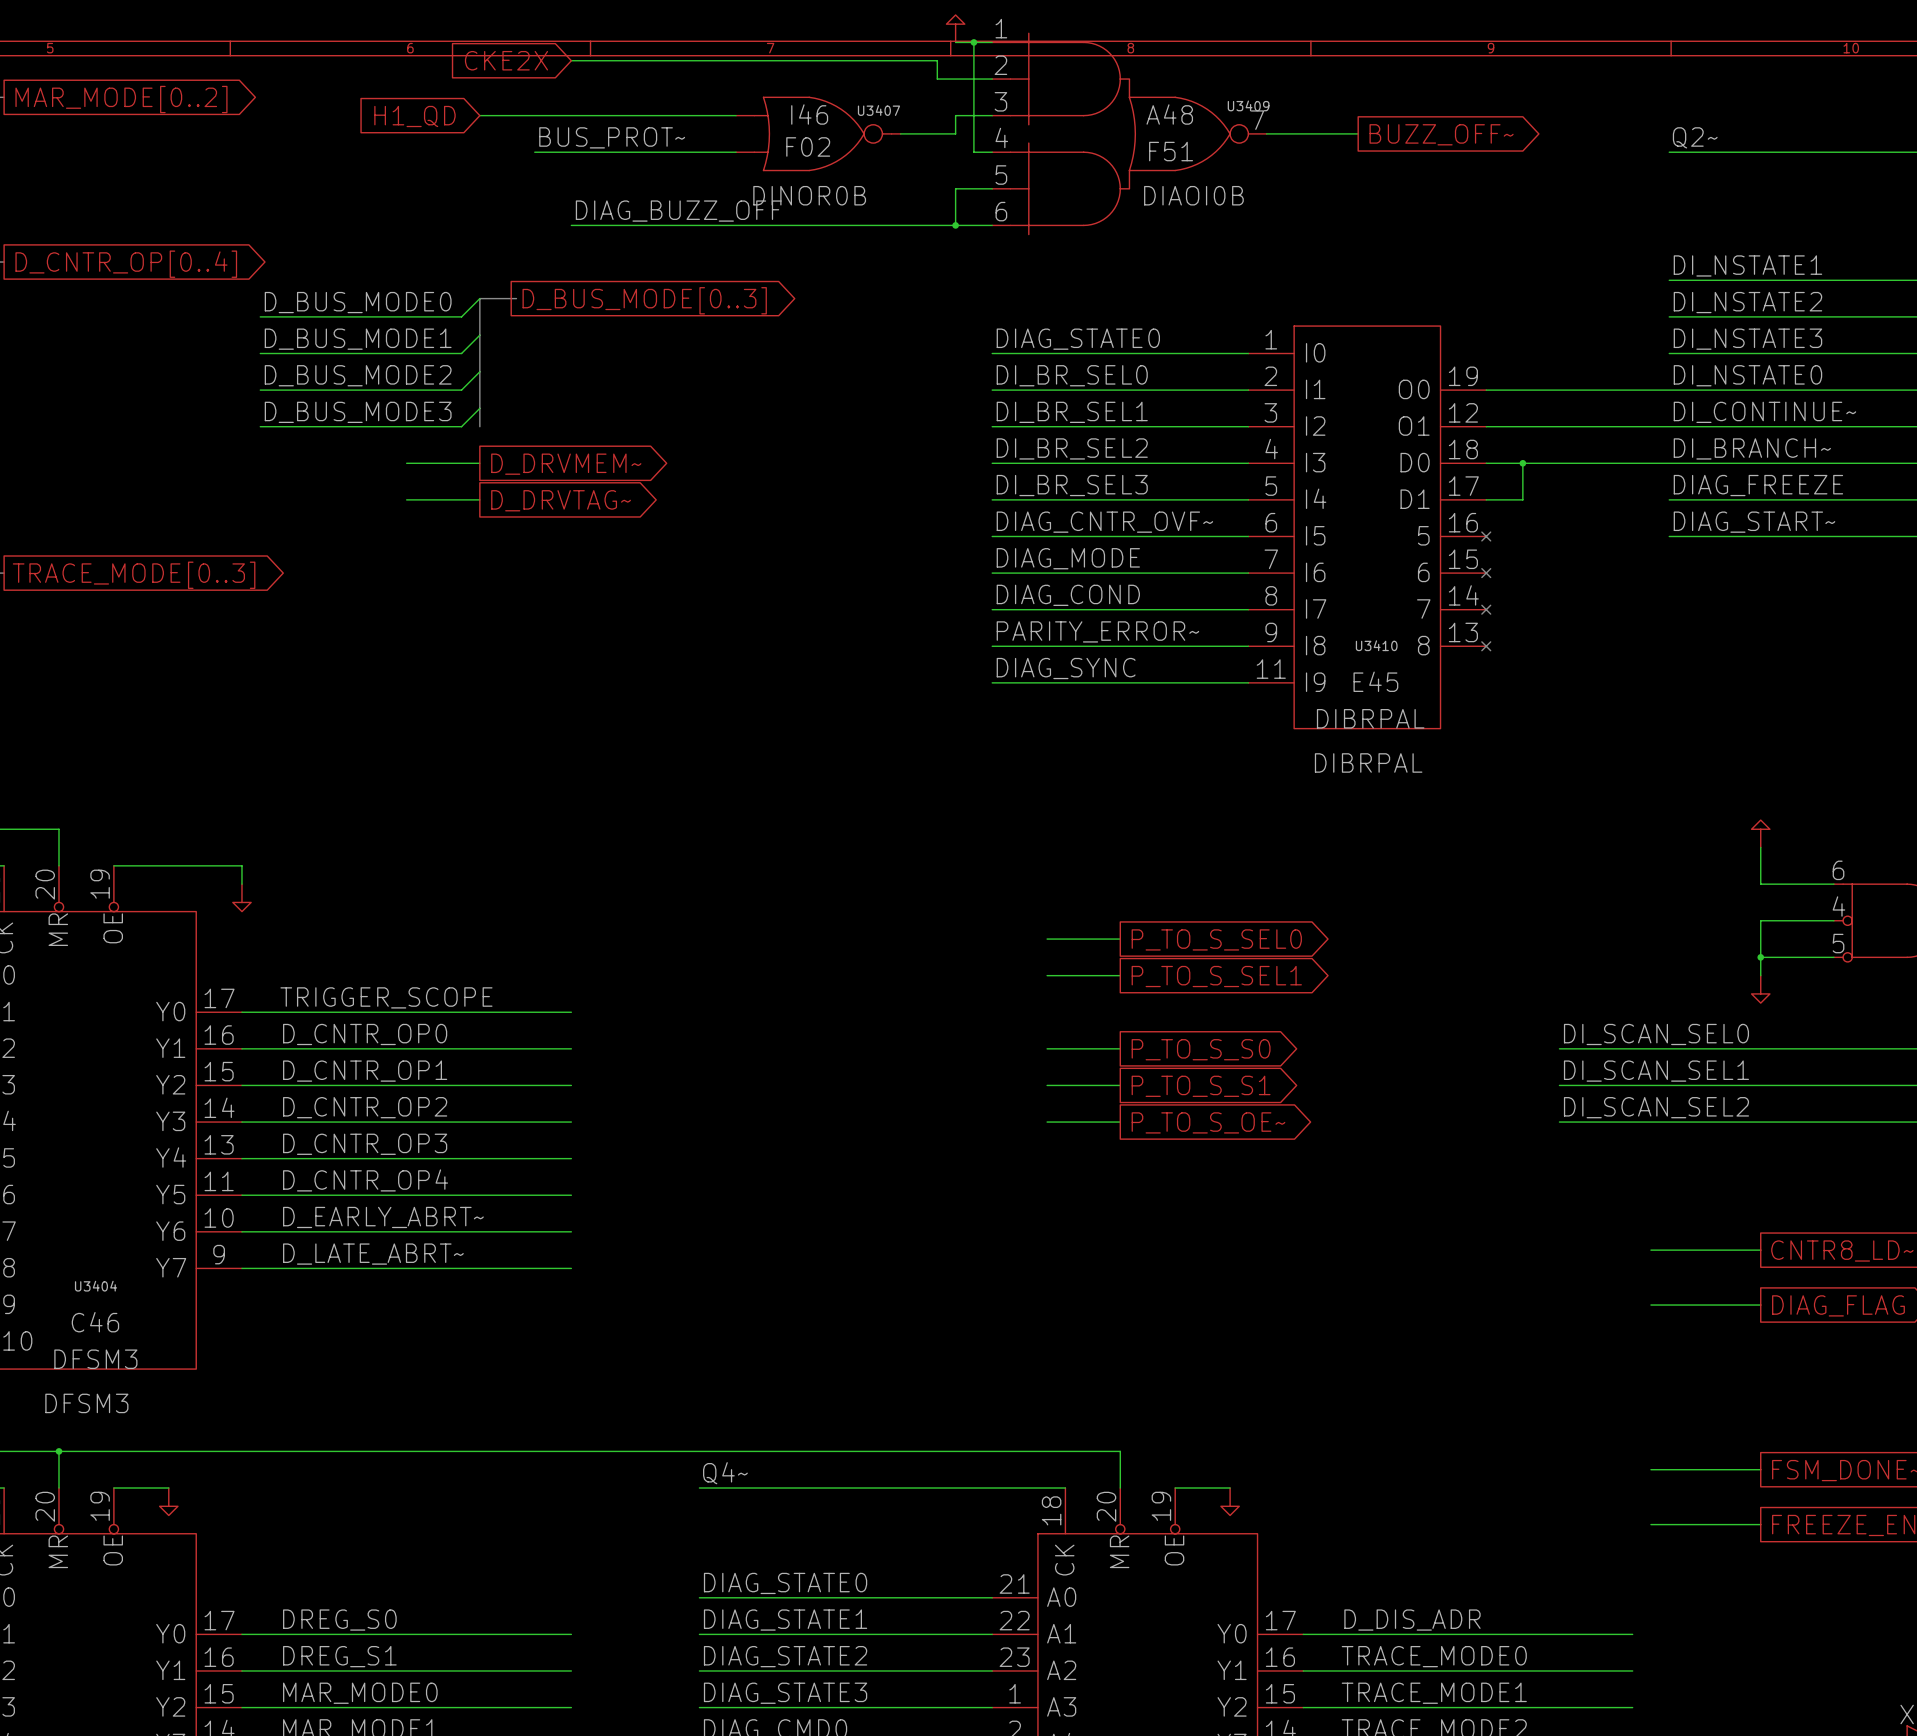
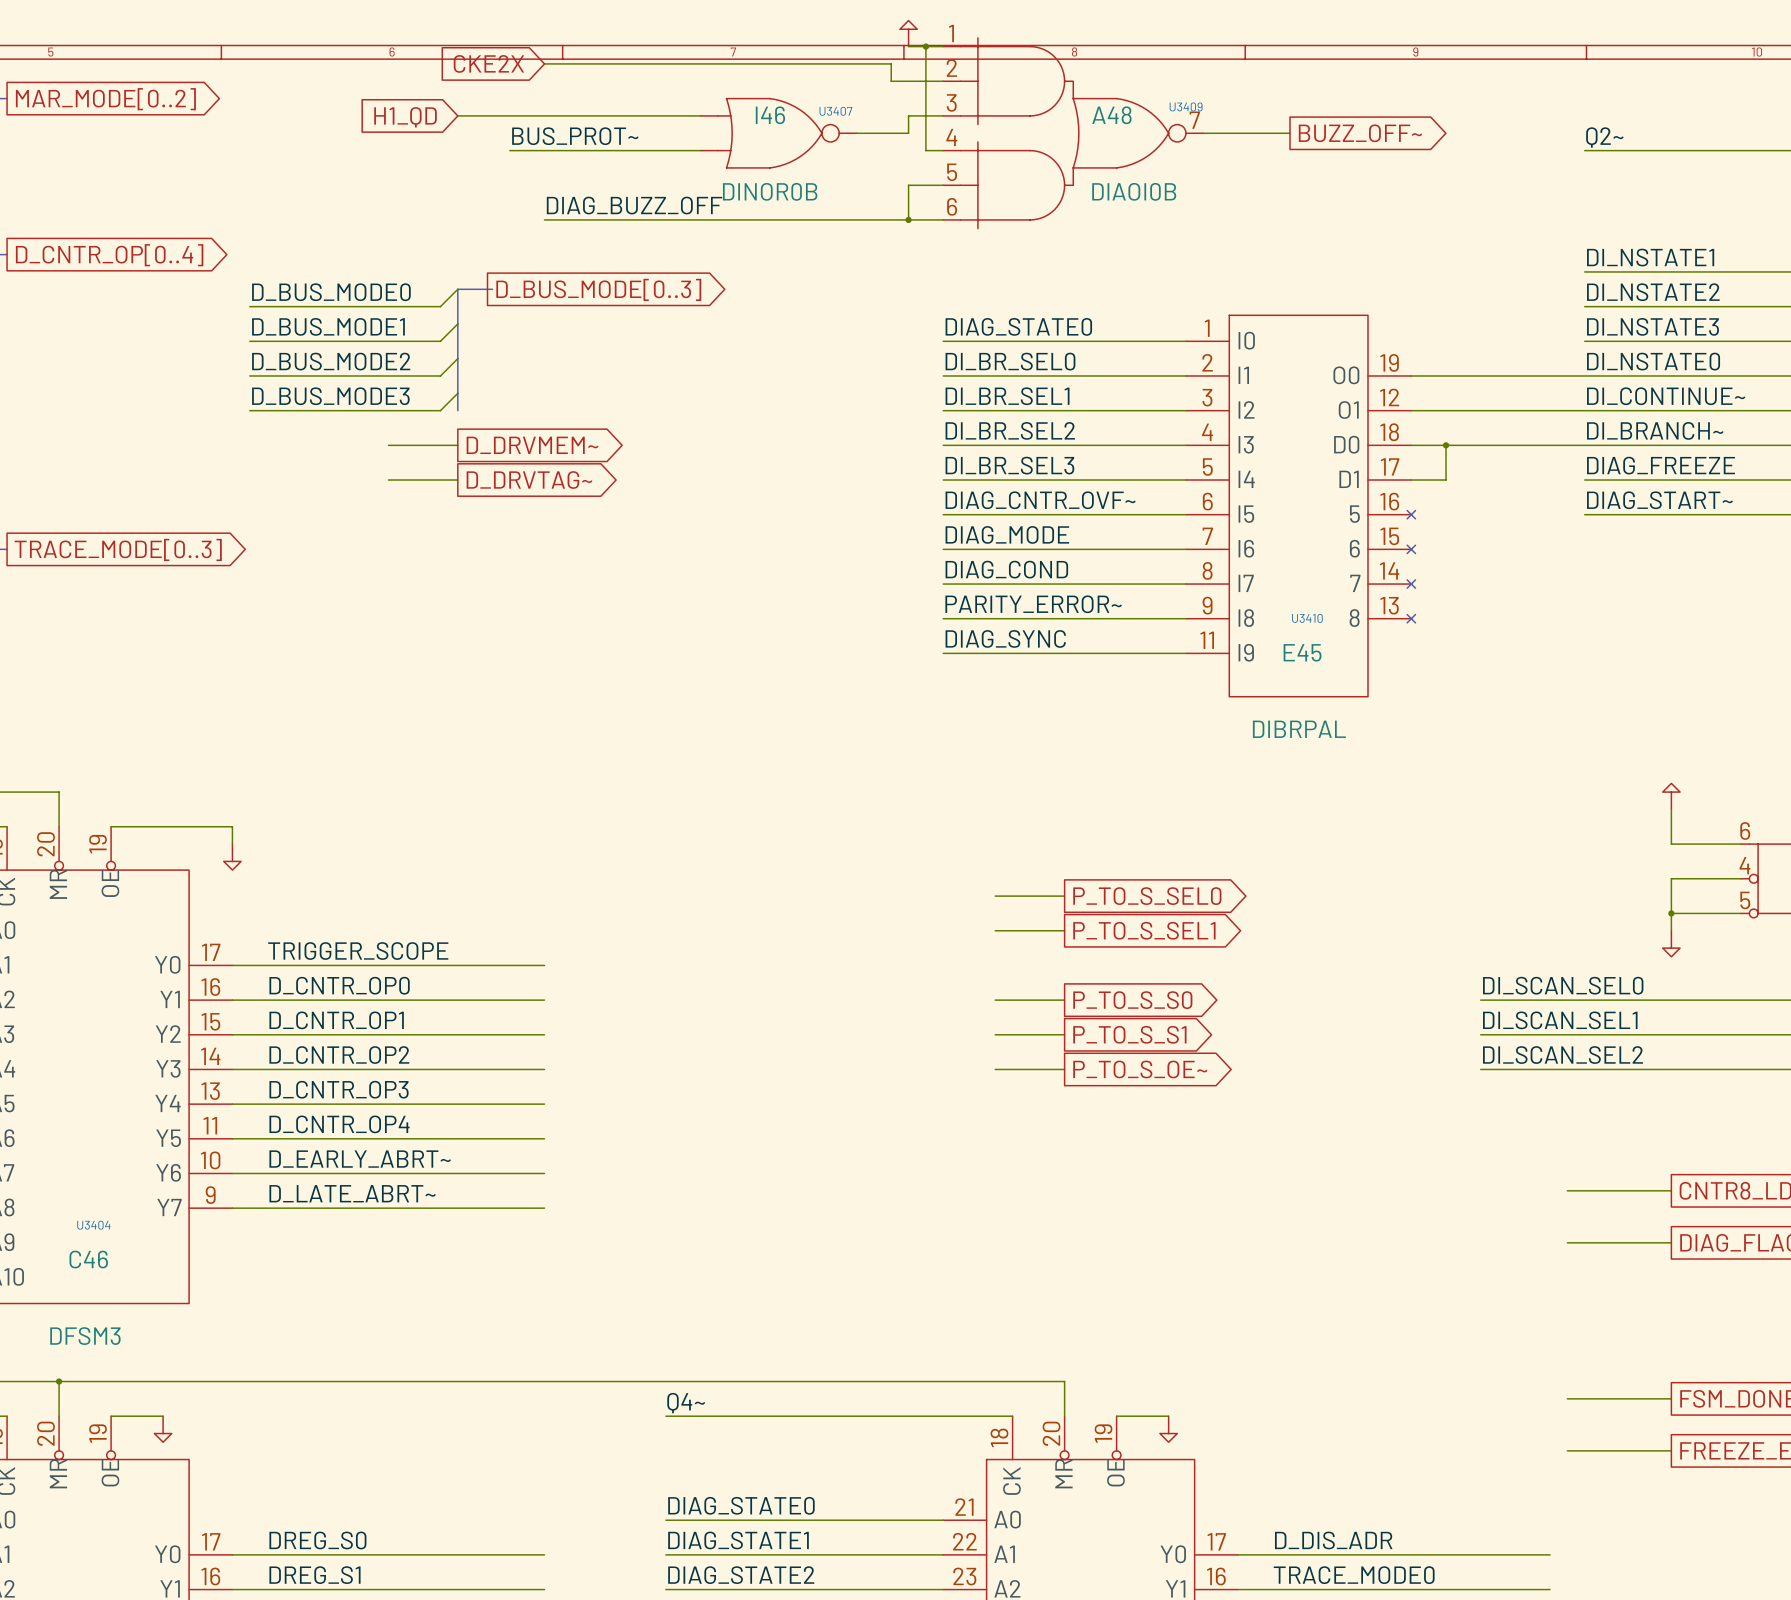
U3407 value: F02 (808, 146) -> none
U3409 value: F51 (1171, 151) -> none
U3410 value: DIBRPAL (1370, 718) -> none
U3404 value: DFSM3 (95, 1359) -> none

